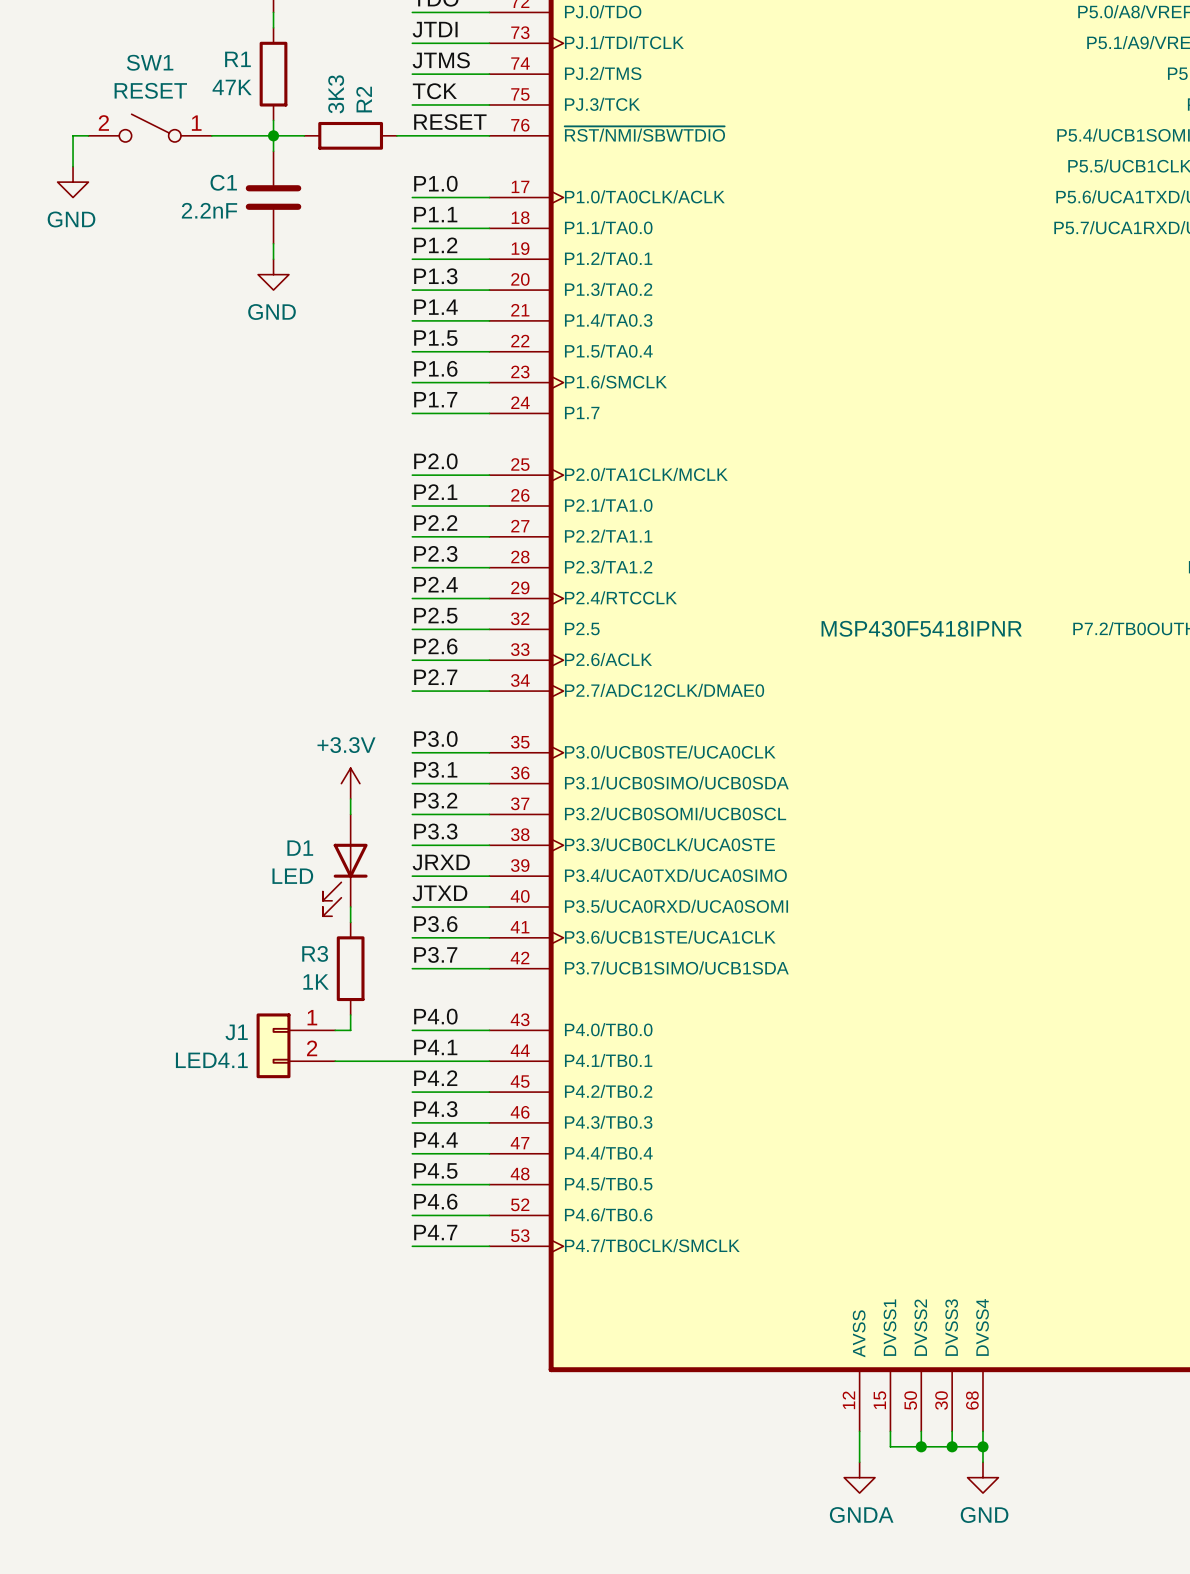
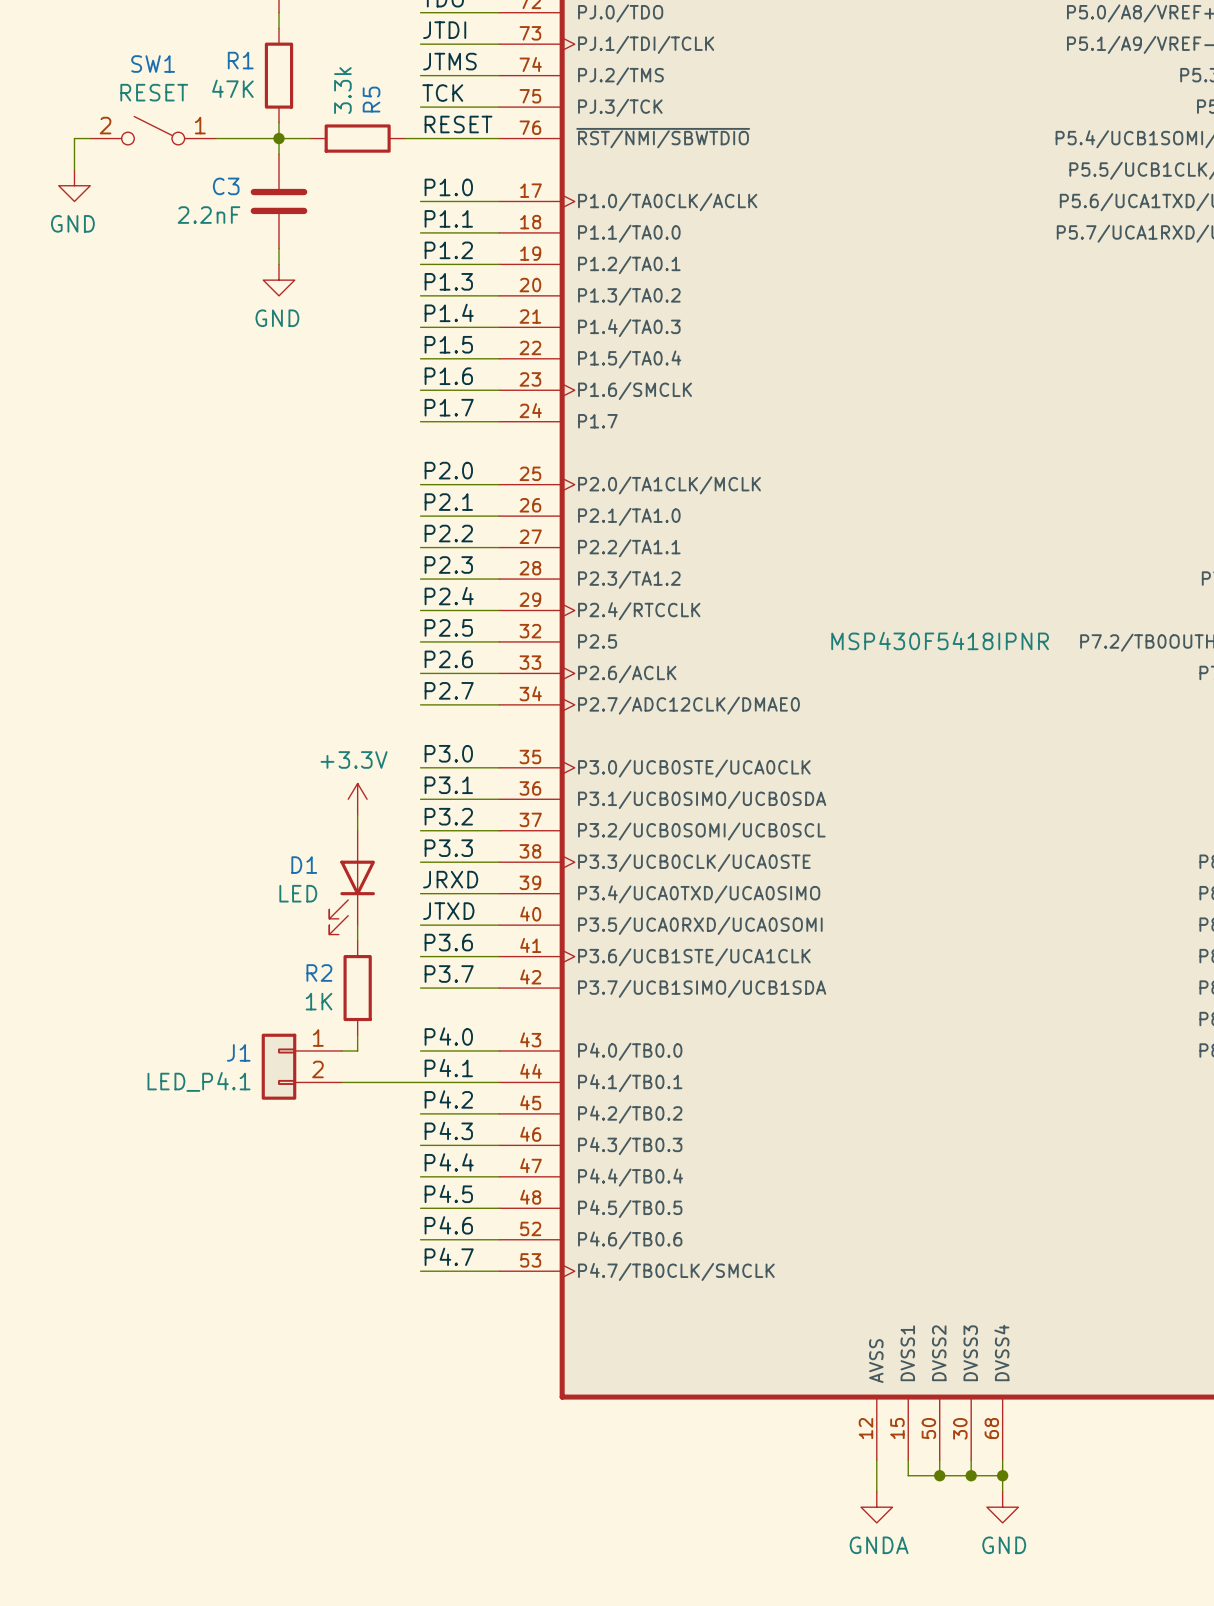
R2 value: 3K3 (336, 94) -> 3.3k (342, 90)
R2 name: R2 (364, 99) -> R5 (371, 99)
C1 name: C1 (223, 182) -> C3 (226, 186)
R3 name: R3 (315, 953) -> R2 (319, 972)
J1 value: LED4.1 (211, 1060) -> LED_P4.1 (199, 1081)

